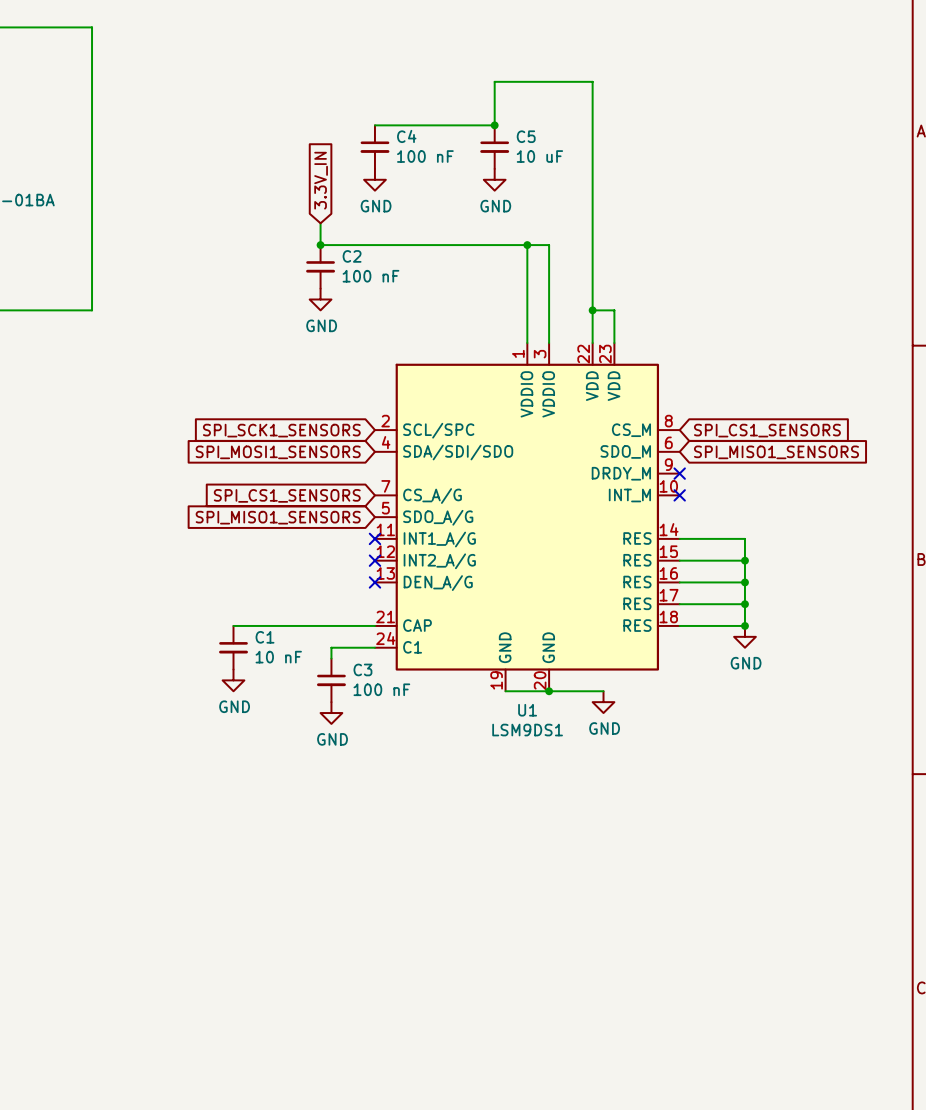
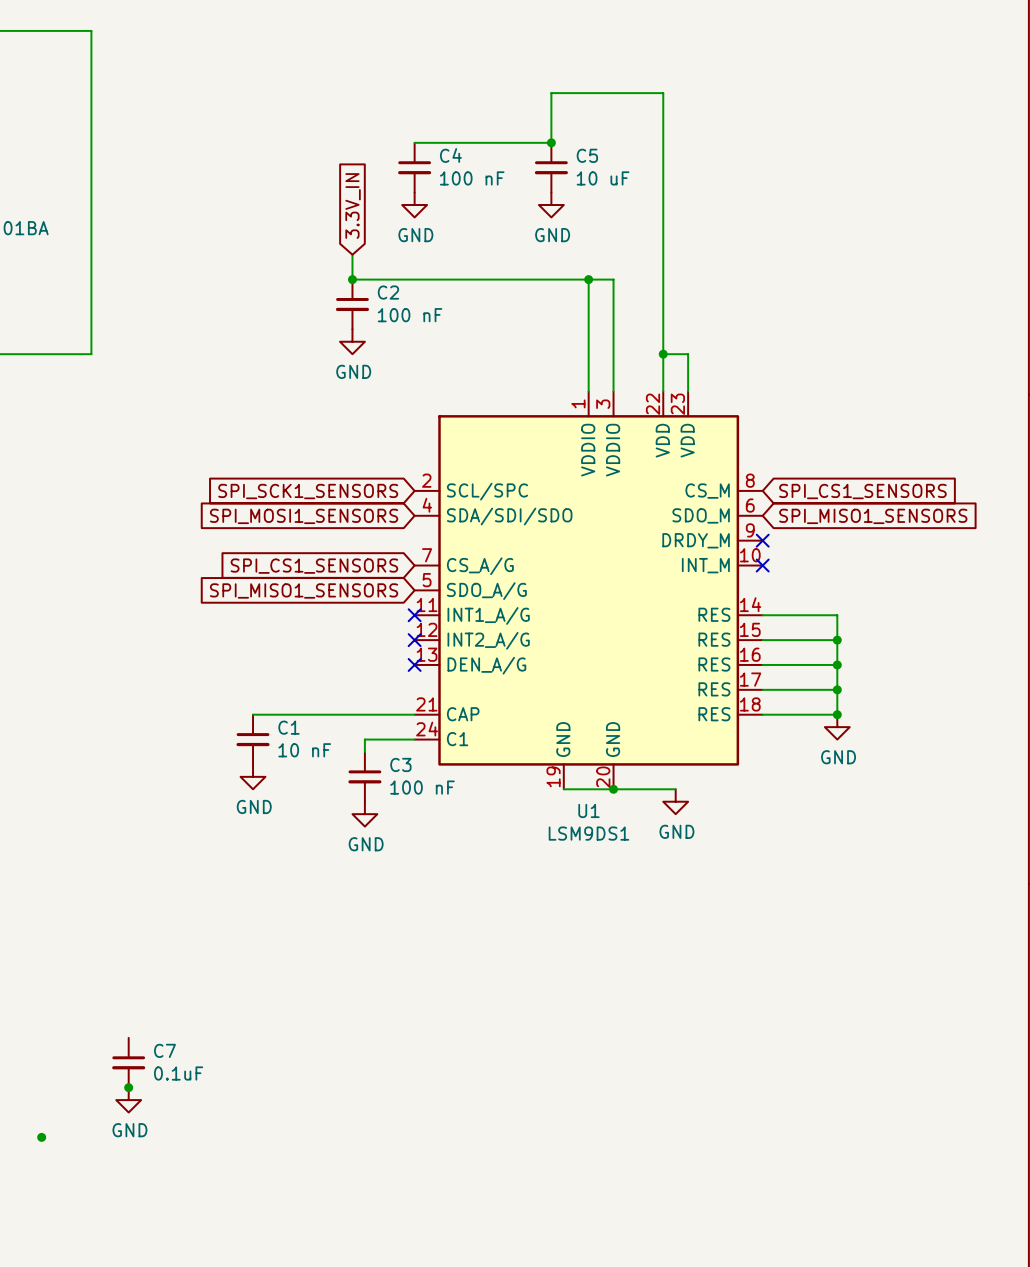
C7: none -> 0.1uF (128, 1062)
junction: none -> (128, 1087)
power symbol: none -> GND (128, 1100)
junction: none -> (41, 1137)

